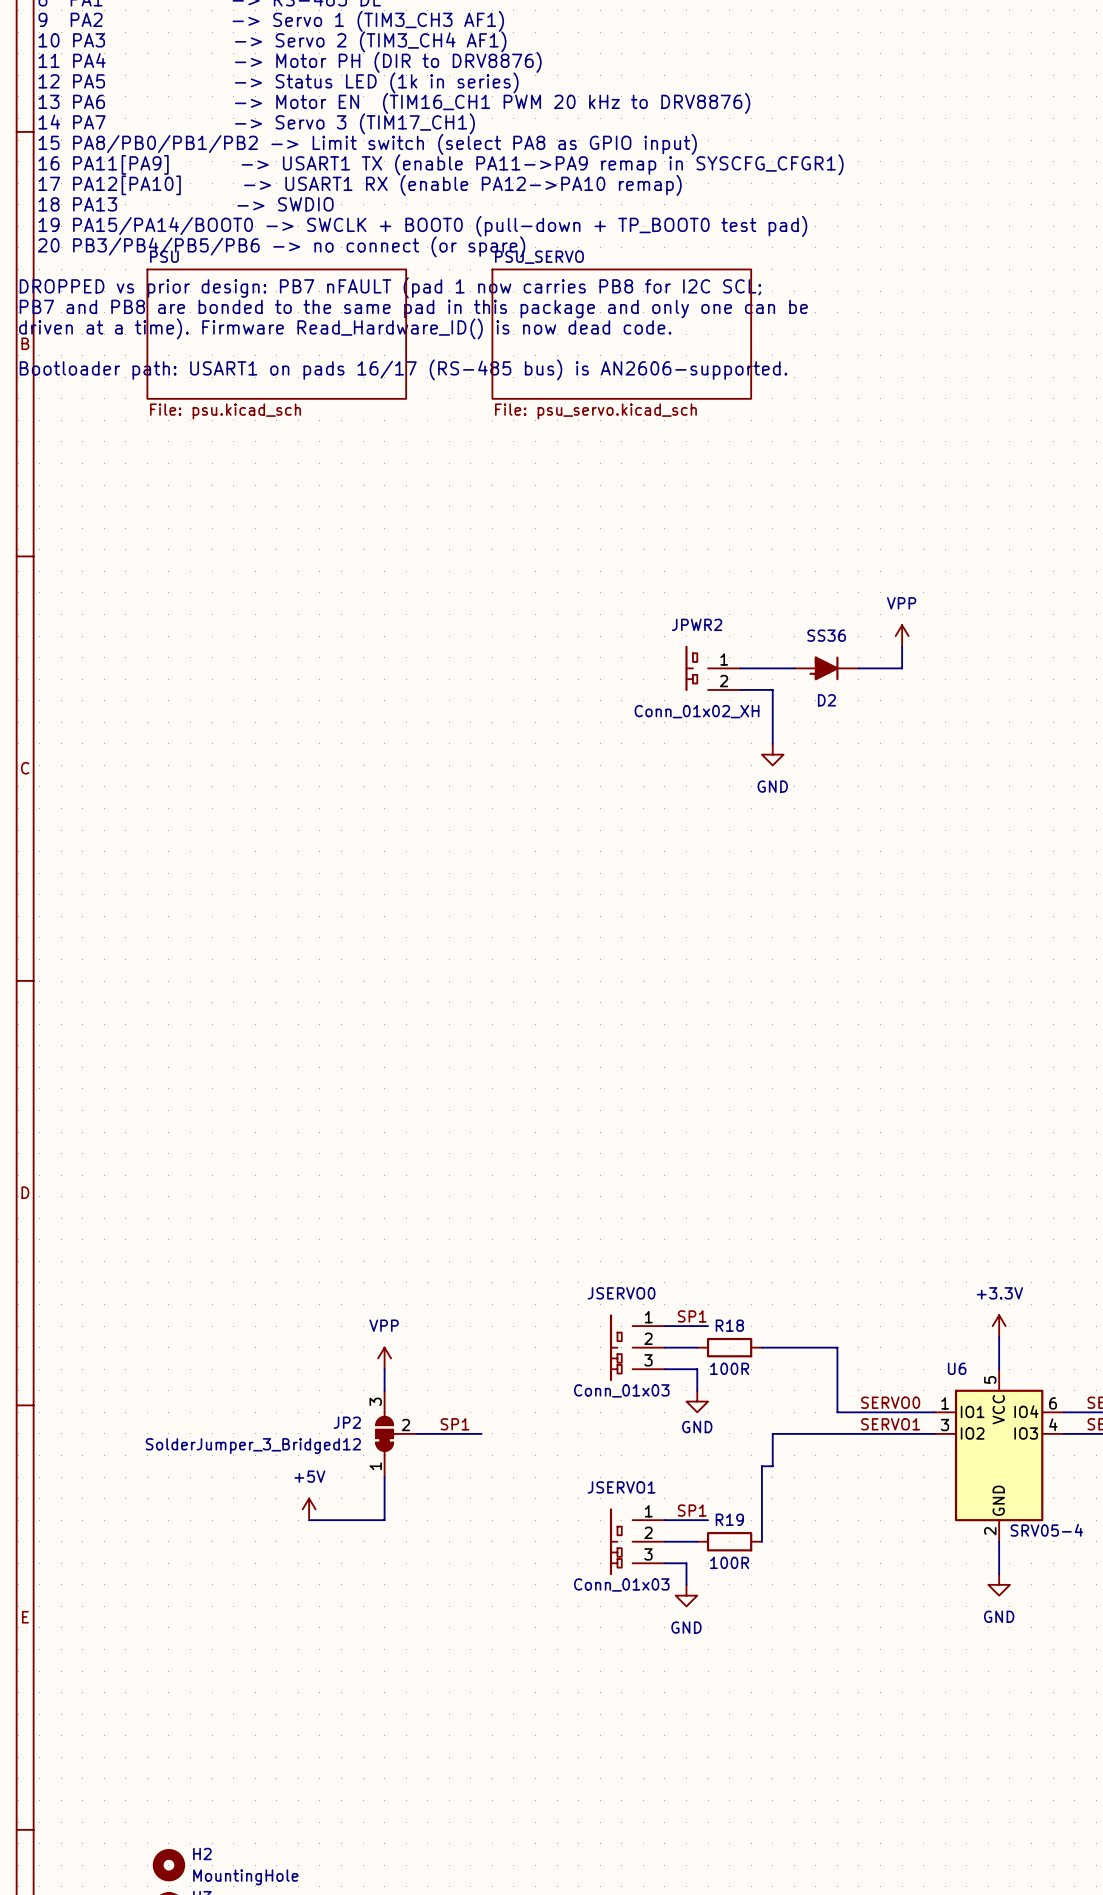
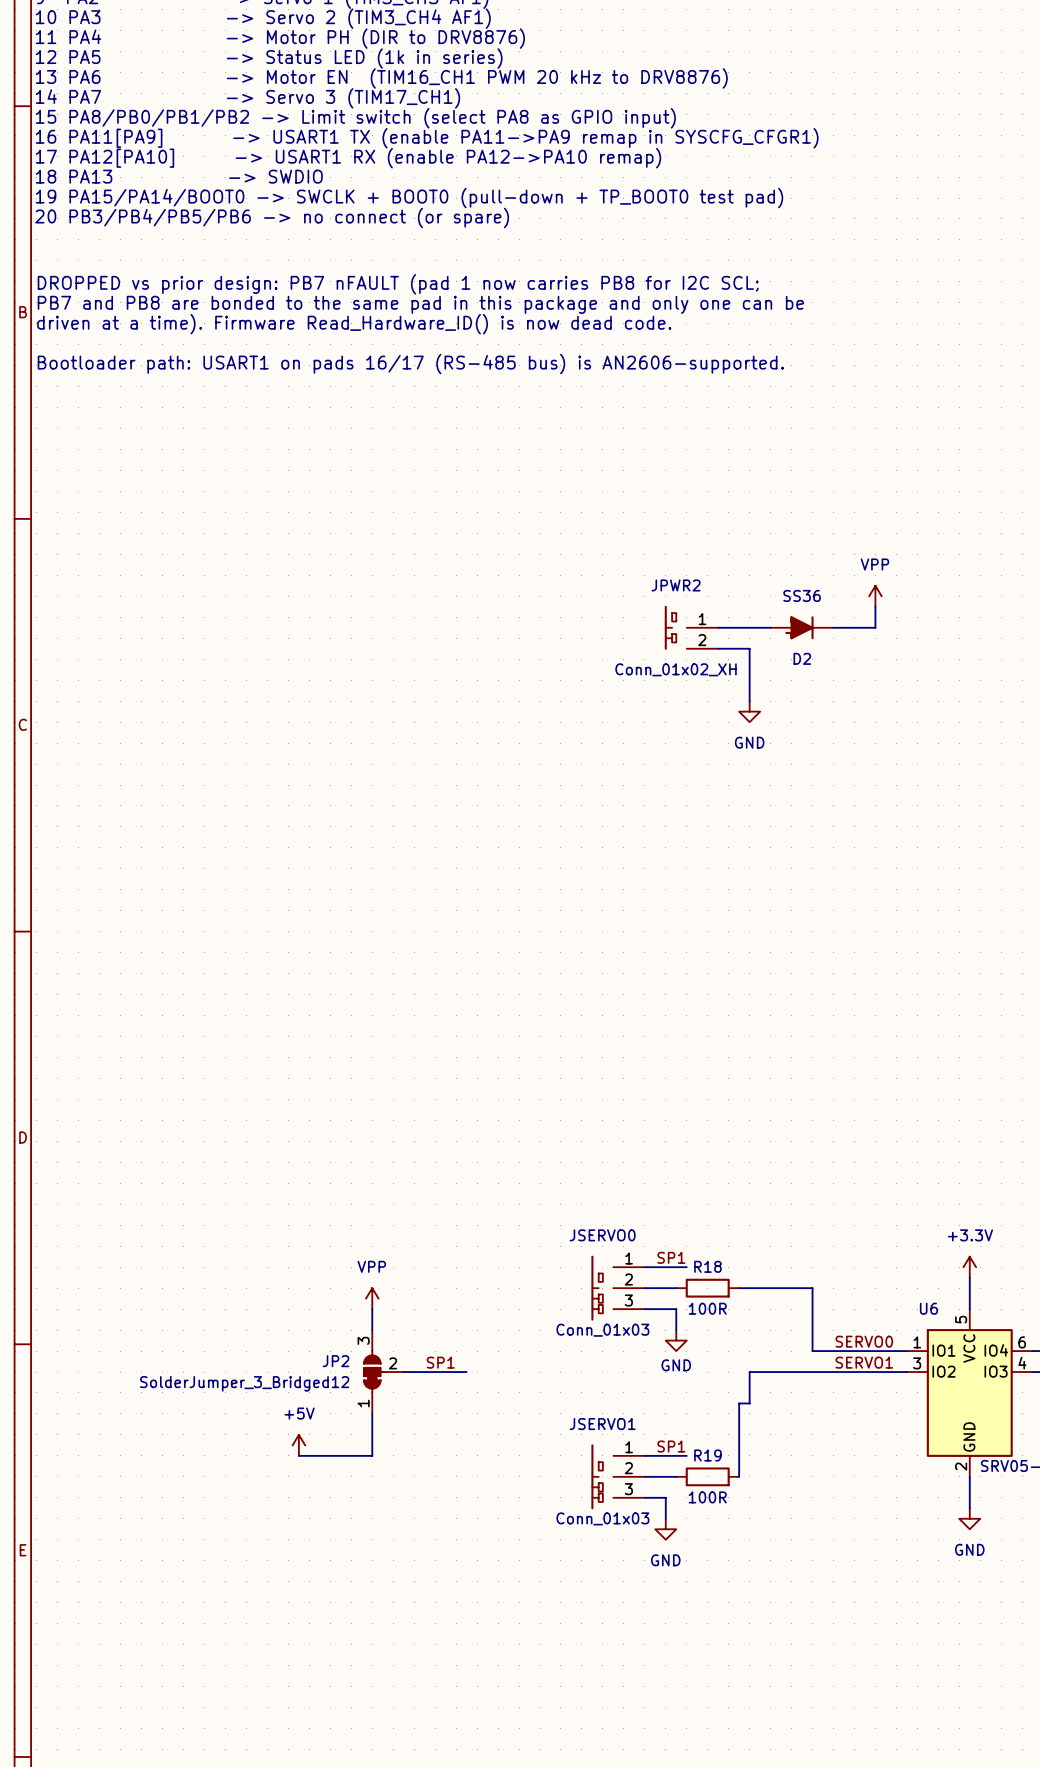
text position: DROPPED vs prior design: PB7 nFAULT (pad 1 now carries PB8 for I2C SCL; (390, 287) -> DROPPED vs prior design: PB7 nFAULT (pad 1 now carries PB8 for I2C SCL; (398, 284)
text position: PB7 and PB8 are bonded to the same pad in this package and only one can be (413, 308) -> PB7 and PB8 are bonded to the same pad in this package and only one can be (420, 304)
text position: driven at a time). Firmware Read_Hardware_ID() is now dead code. (345, 328) -> driven at a time). Firmware Read_Hardware_ID() is now dead code. (354, 324)
sheet PSU: File: psu.kicad_sch (276, 334) -> none
sheet PSU_SERVO: File: psu_servo.kicad_sch (621, 334) -> none
text position: Bootloader path: USART1 on pads 16/17 (RS-485 bus) is AN2606-supported. (403, 369) -> Bootloader path: USART1 on pads 16/17 (RS-485 bus) is AN2606-supported. (410, 364)

